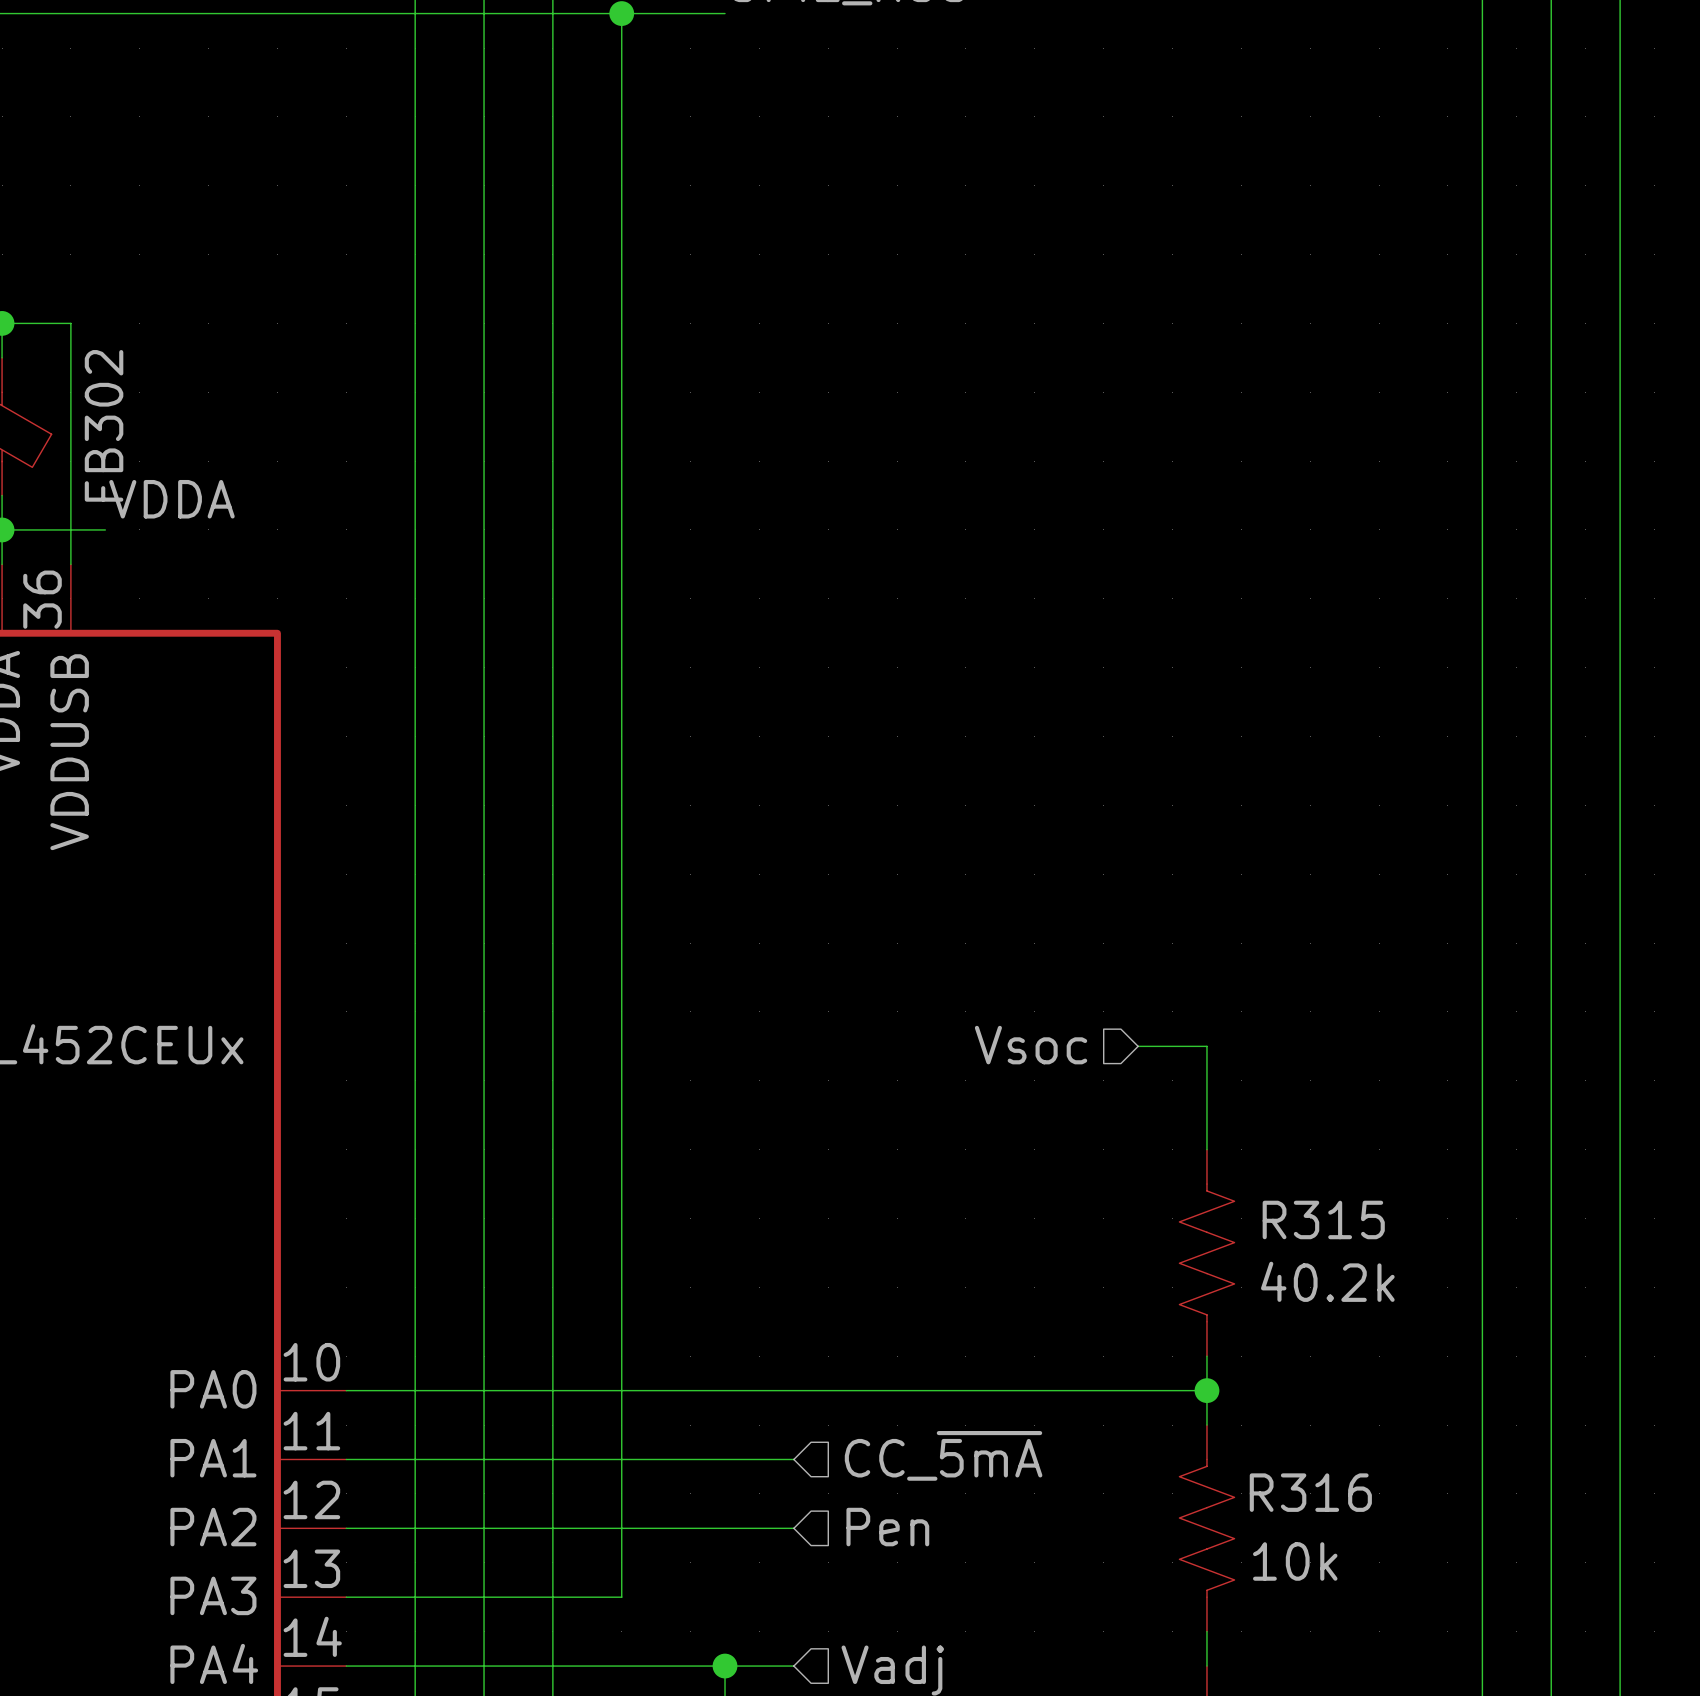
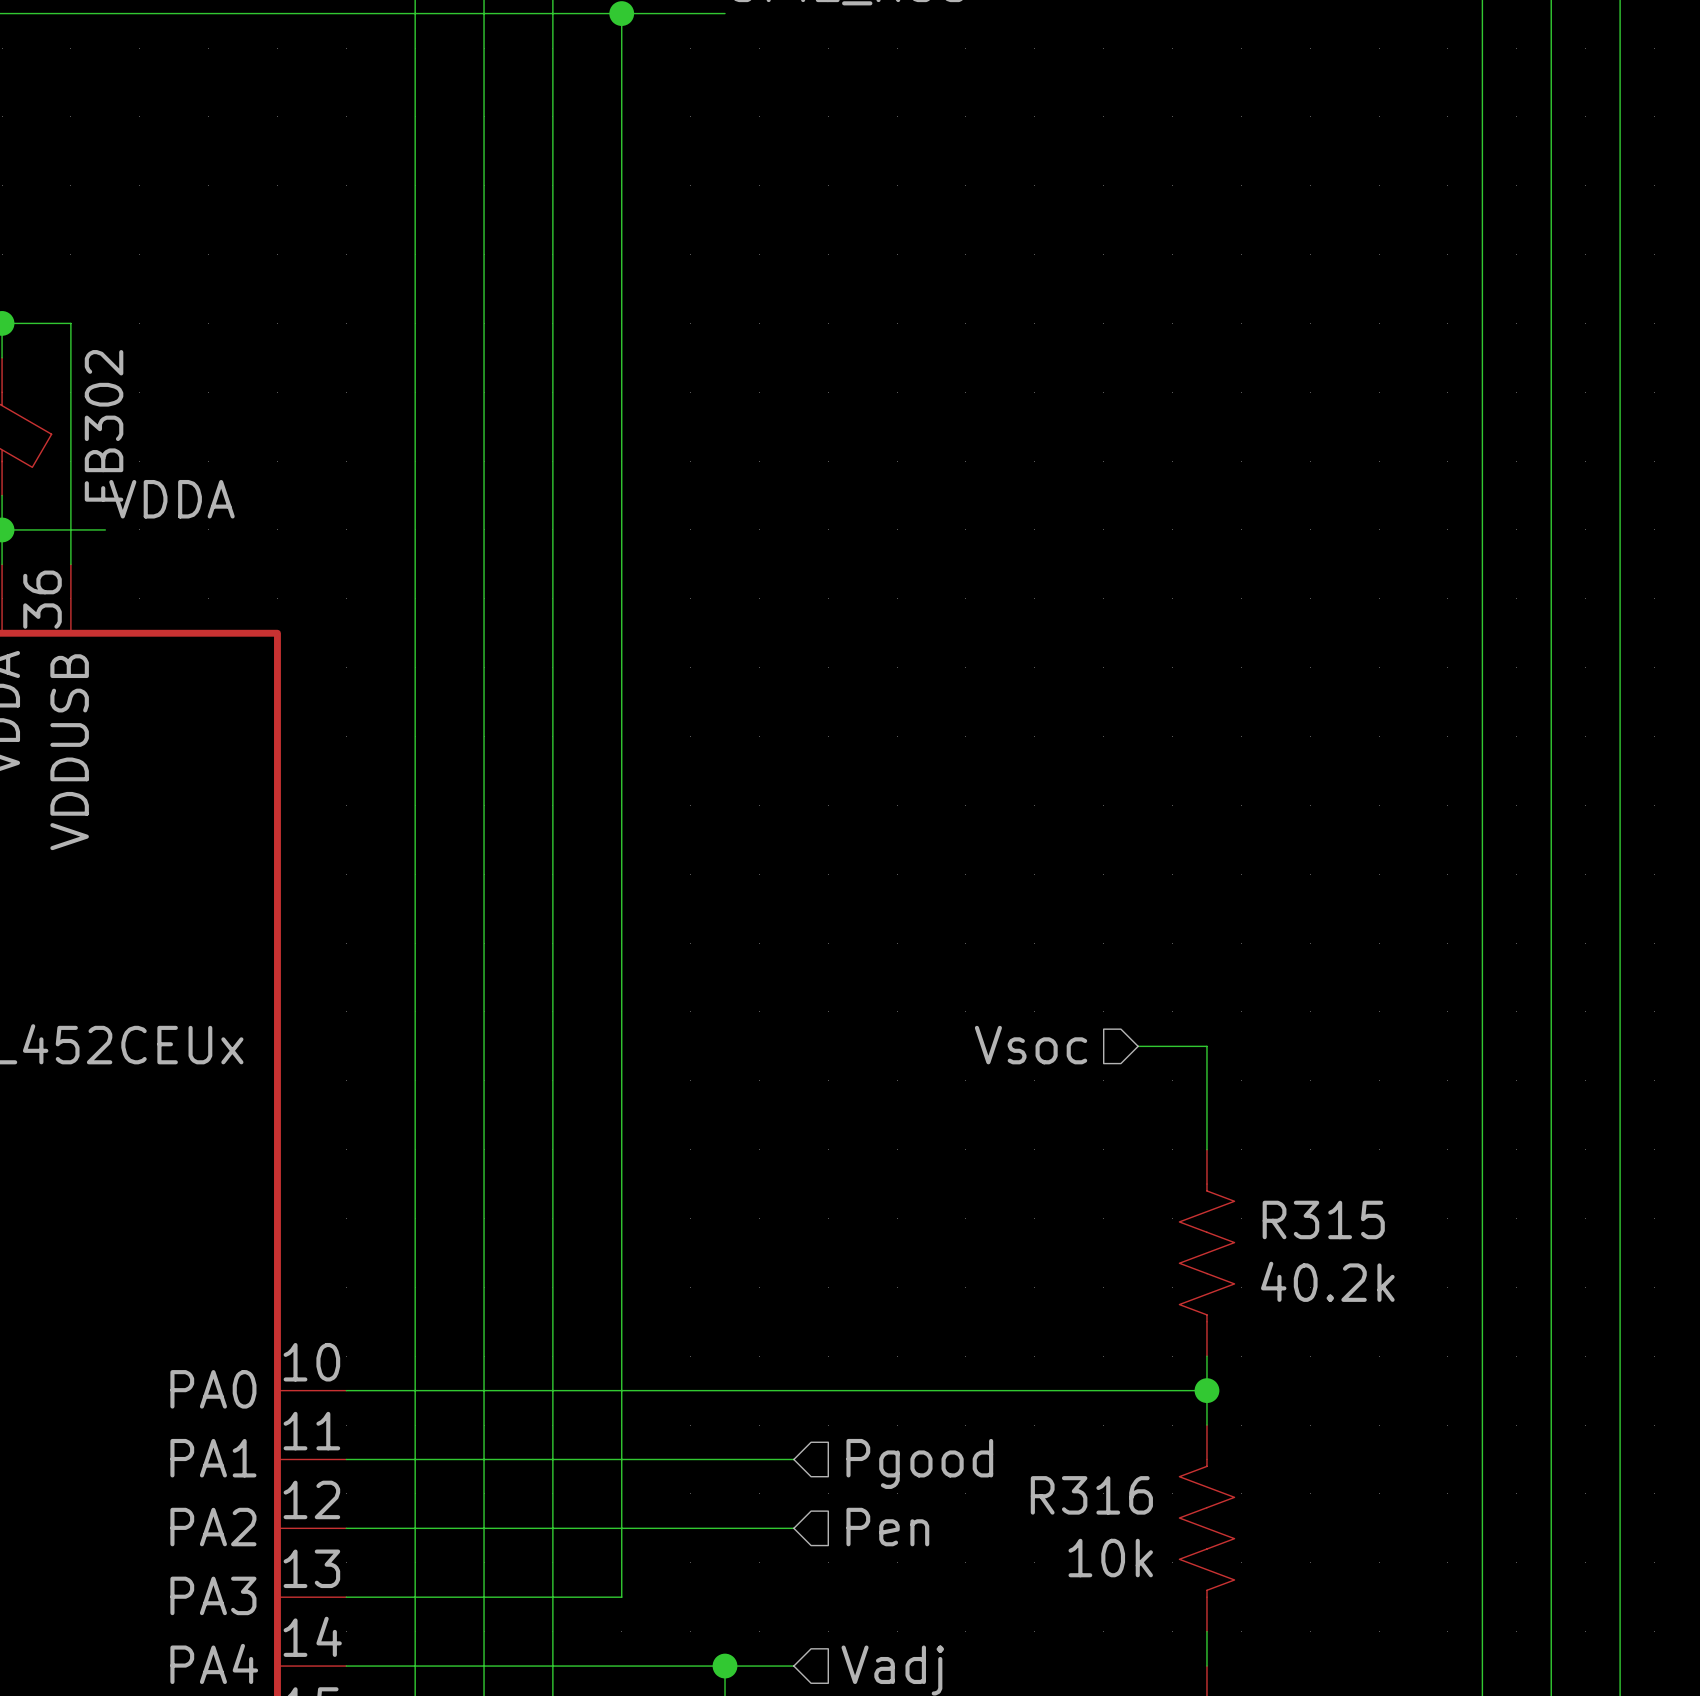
hierarchical label: CC_~{5mA} (943, 1455) -> Pgood (919, 1463)
R316 name position: R316 (1310, 1492) -> R316 (1091, 1495)
R316 value position: 10k (1295, 1561) -> 10k (1110, 1558)

